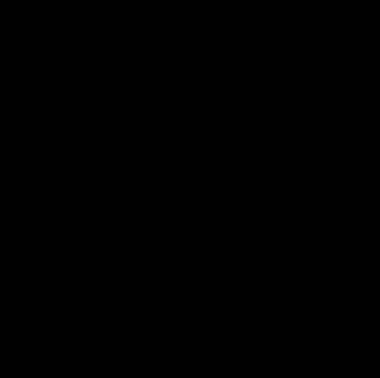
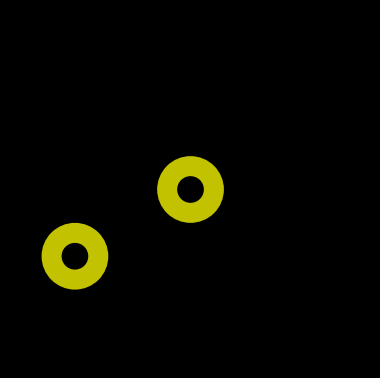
part: none -> (132, 222)

